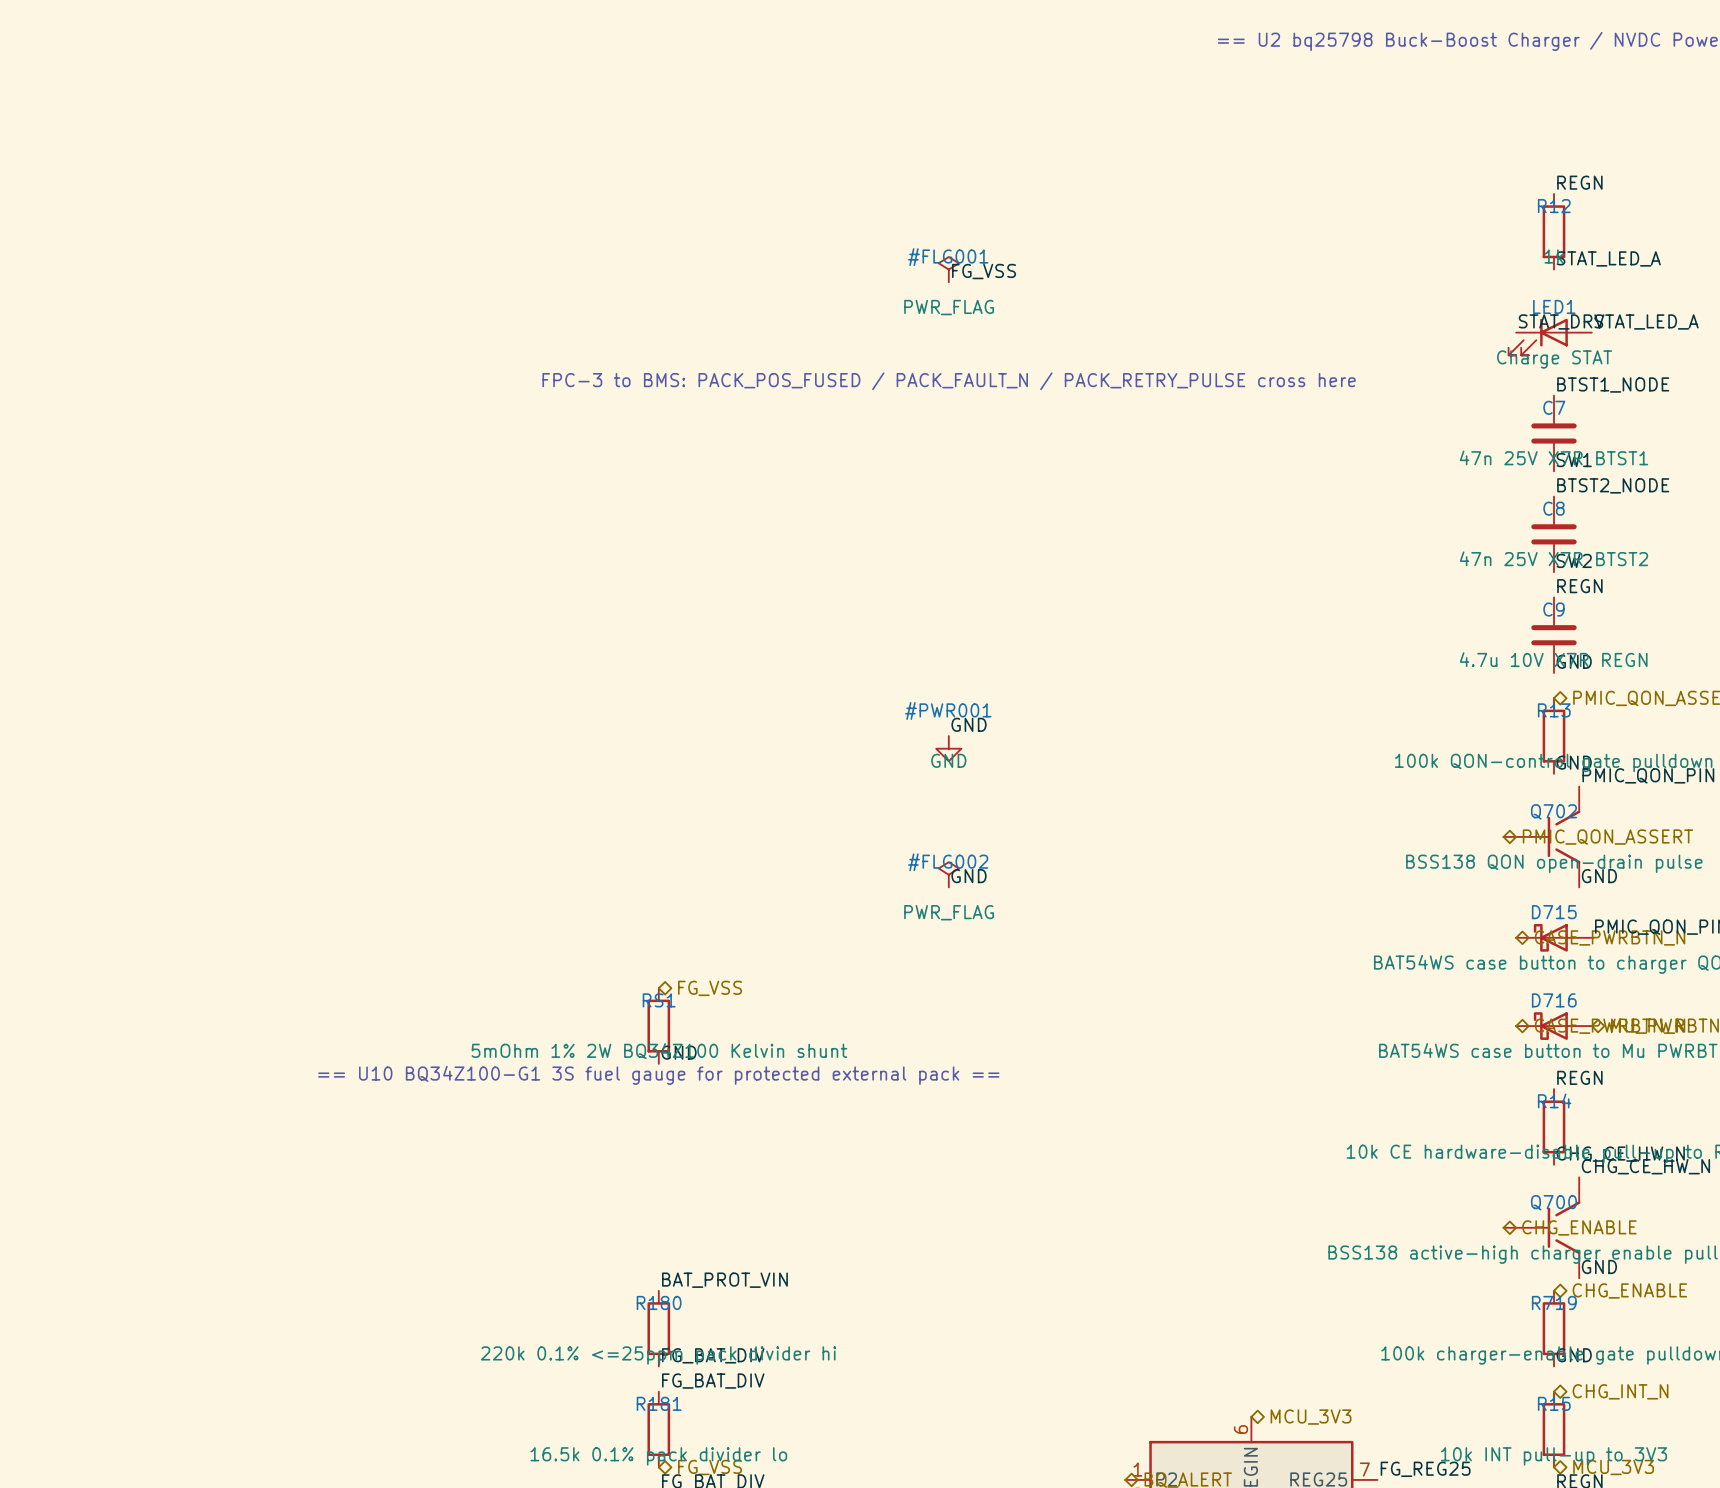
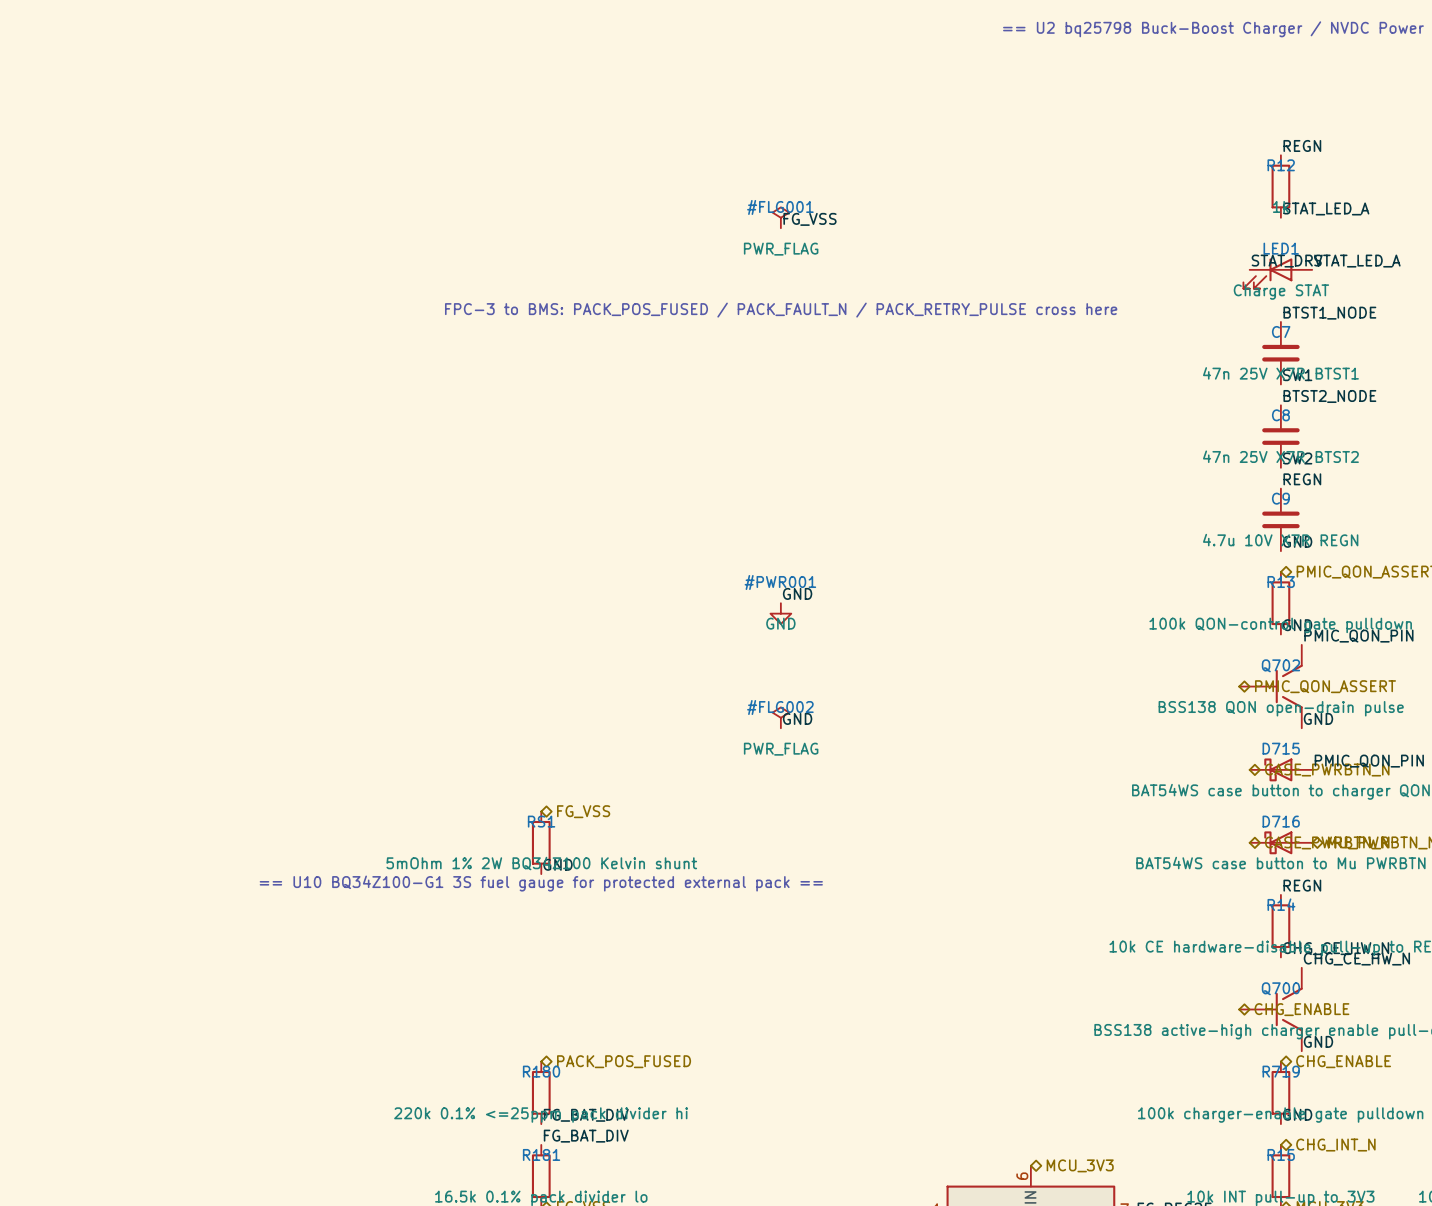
label: BAT_PROT_VIN (724, 1280) -> none
hierarchical label: none -> PACK_POS_FUSED (624, 1061)

